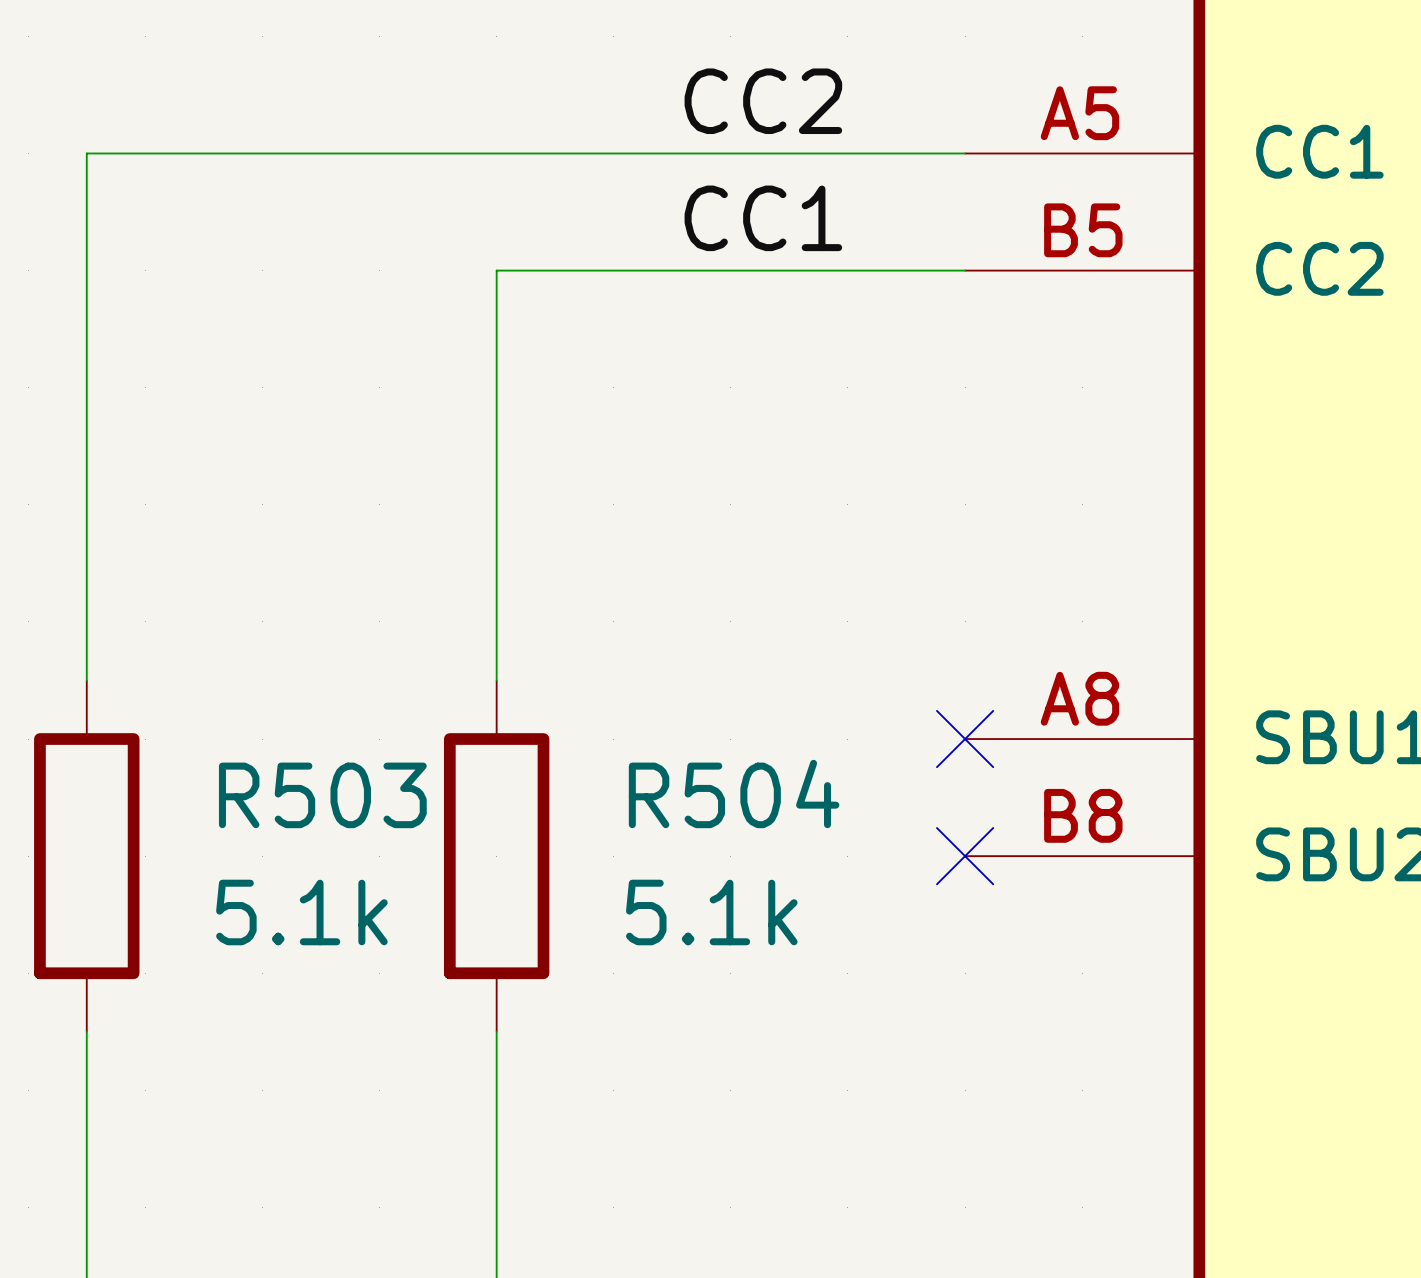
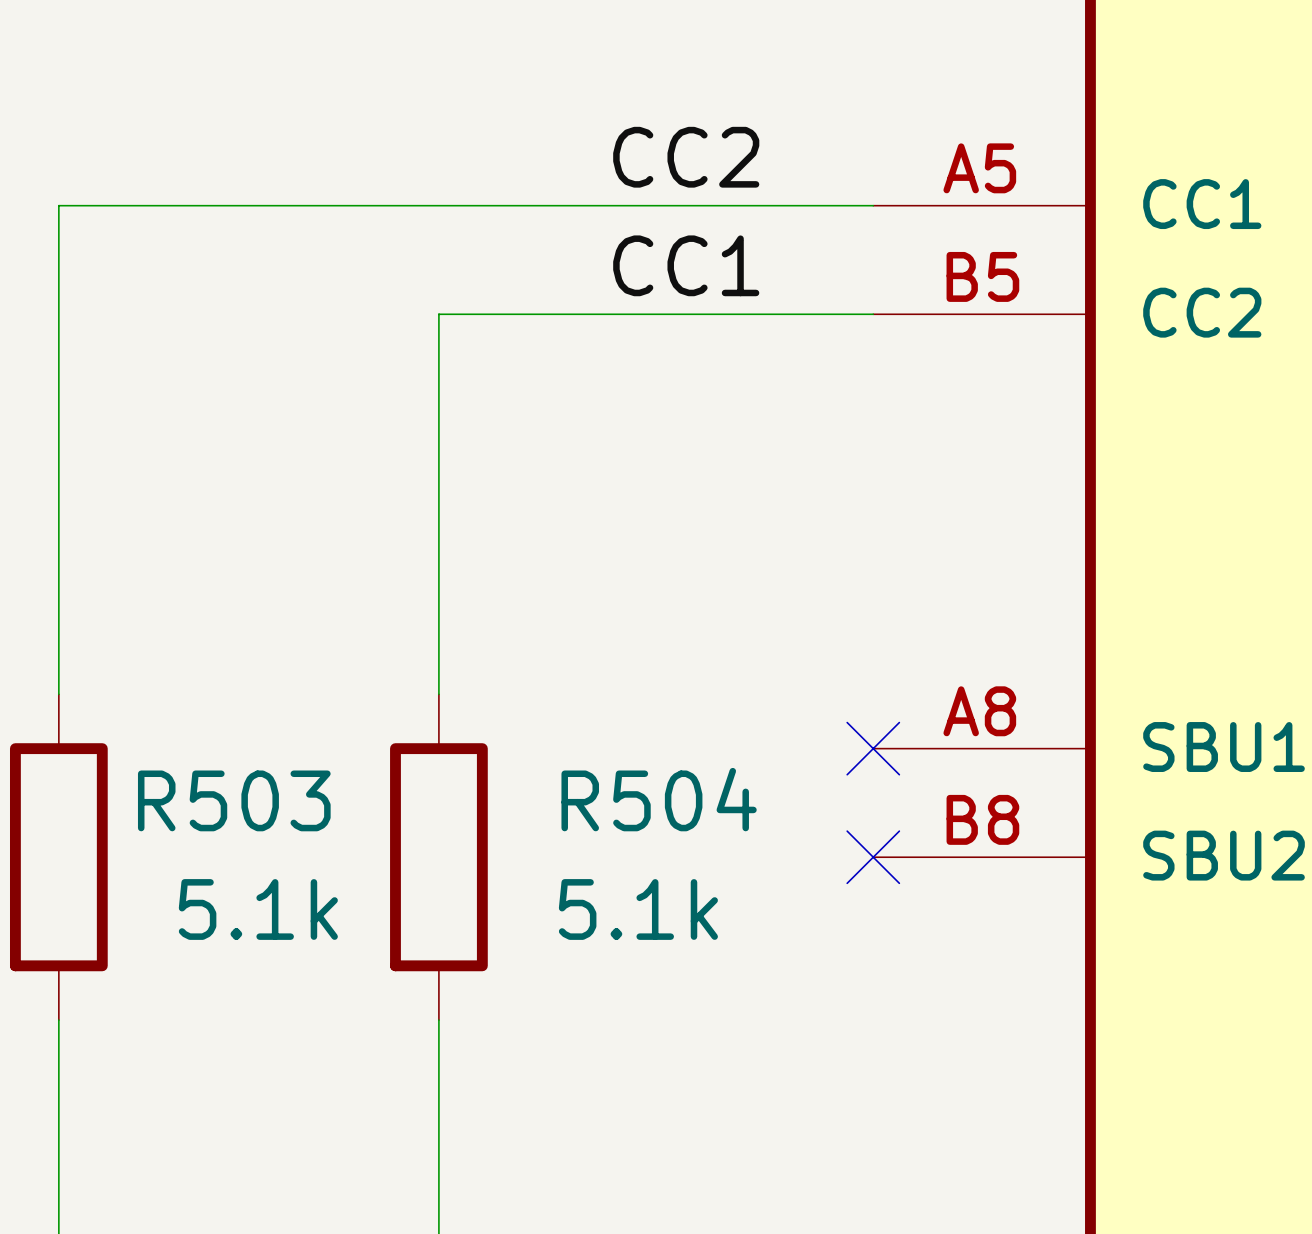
R503 name position: R503 (322, 795) -> R503 (234, 800)

